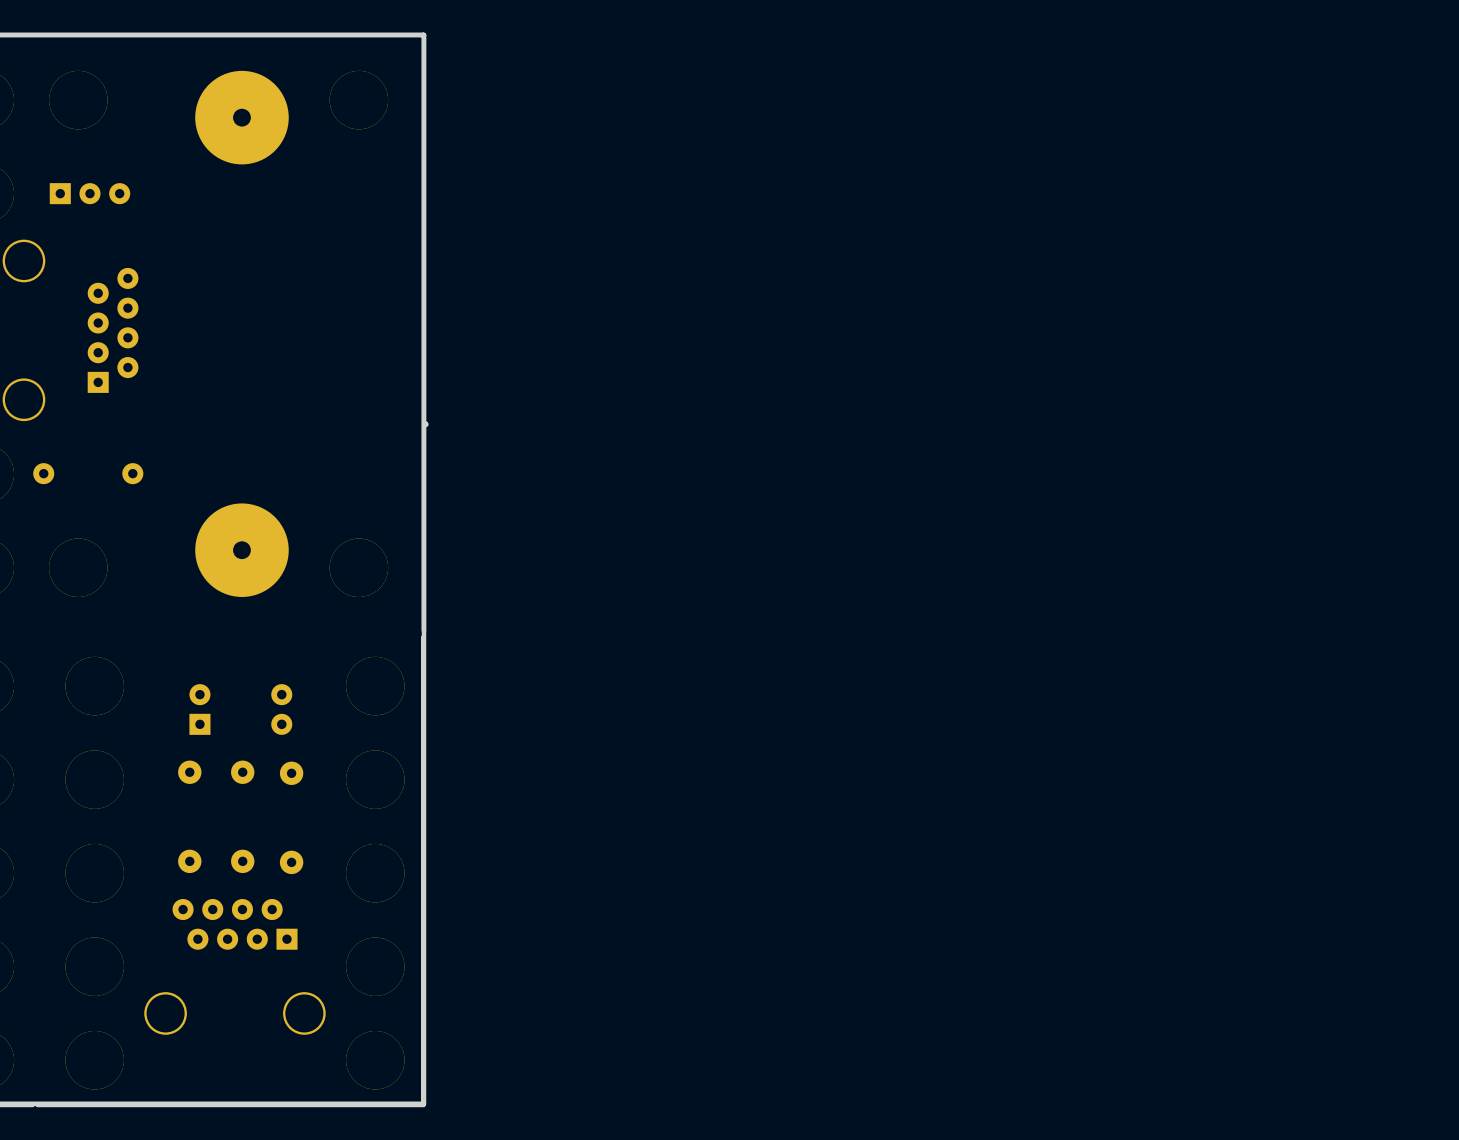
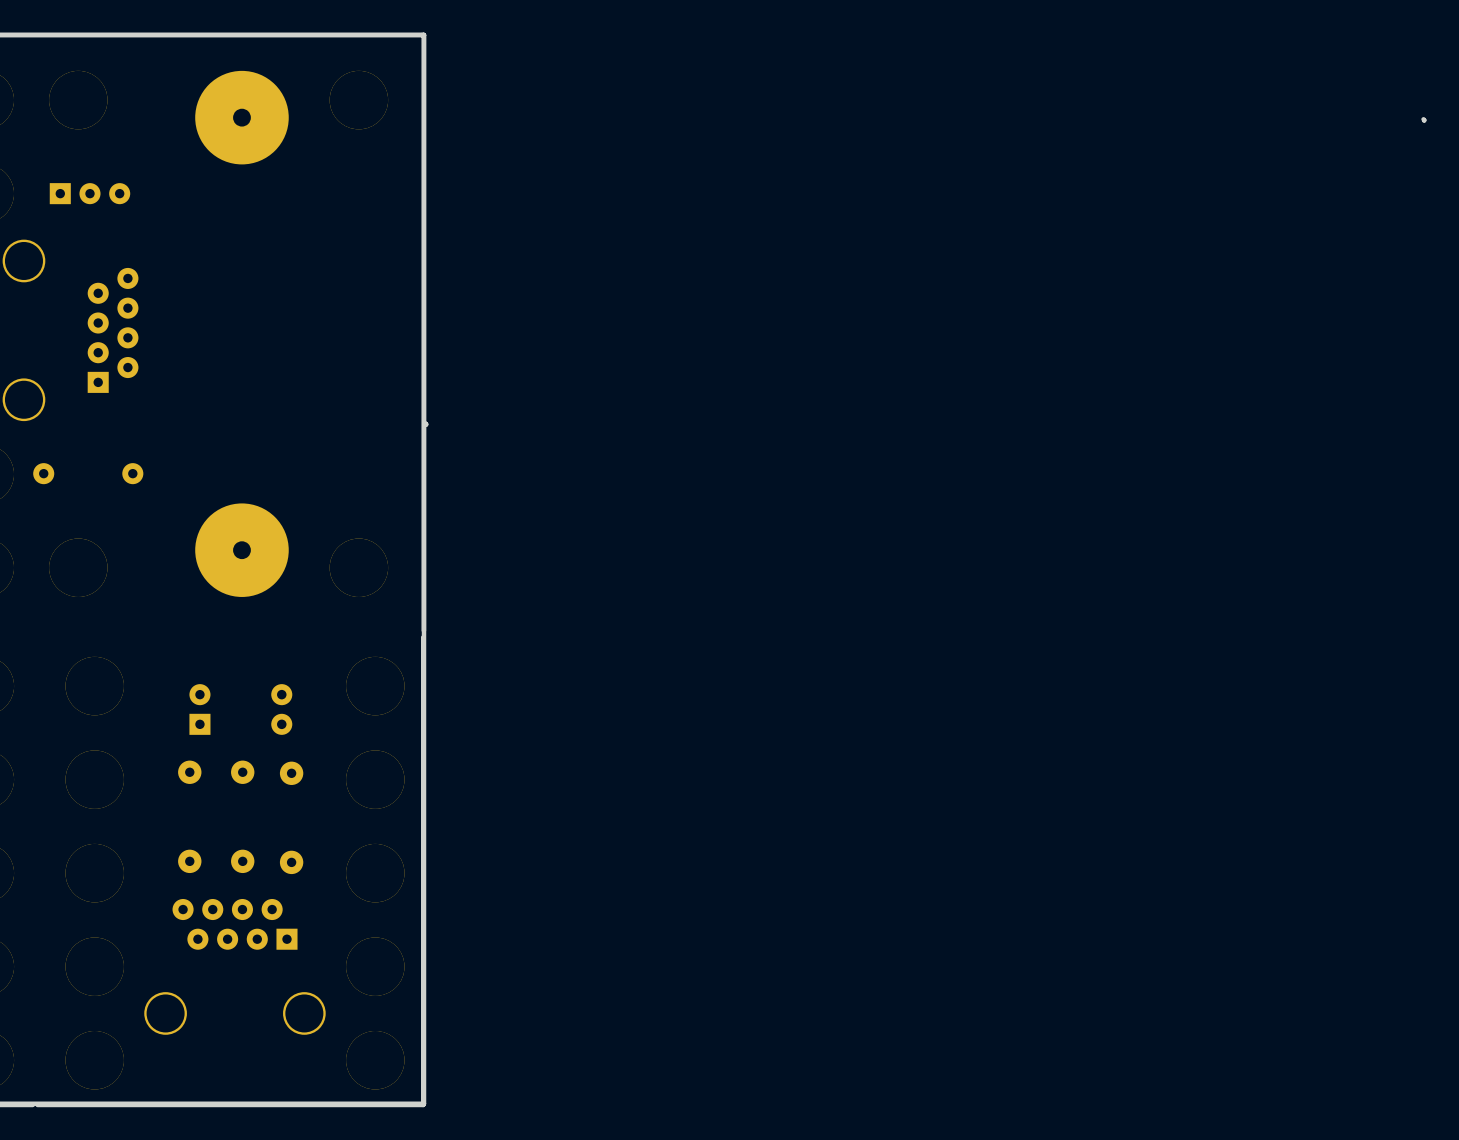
board edge: none -> (1423, 119) (1424, 120)

